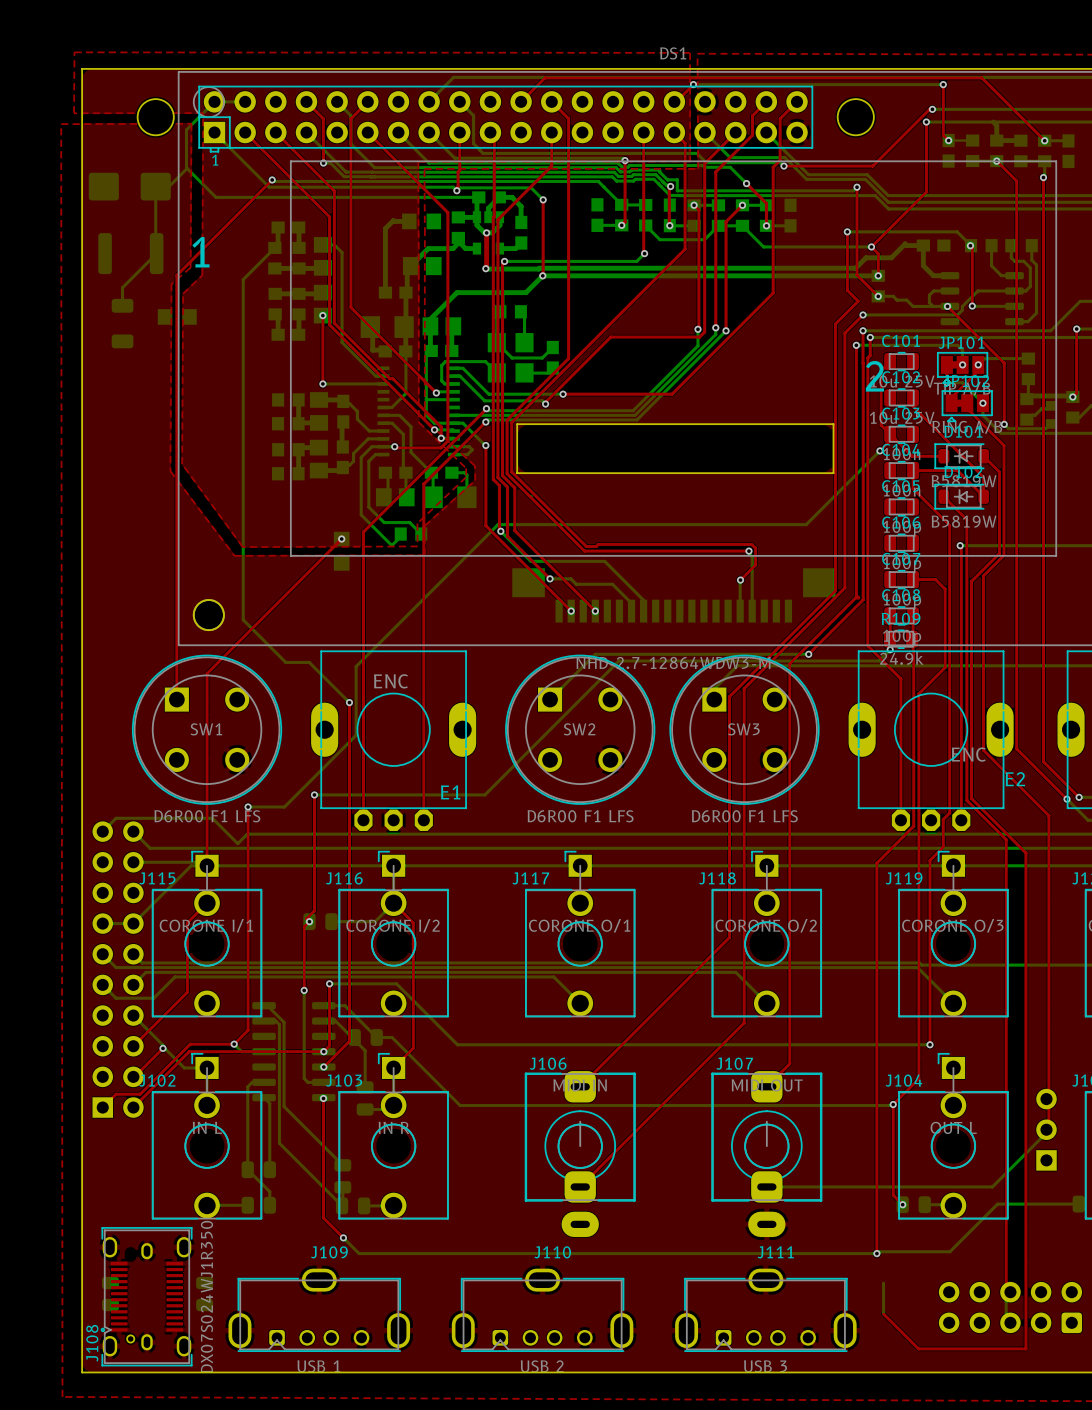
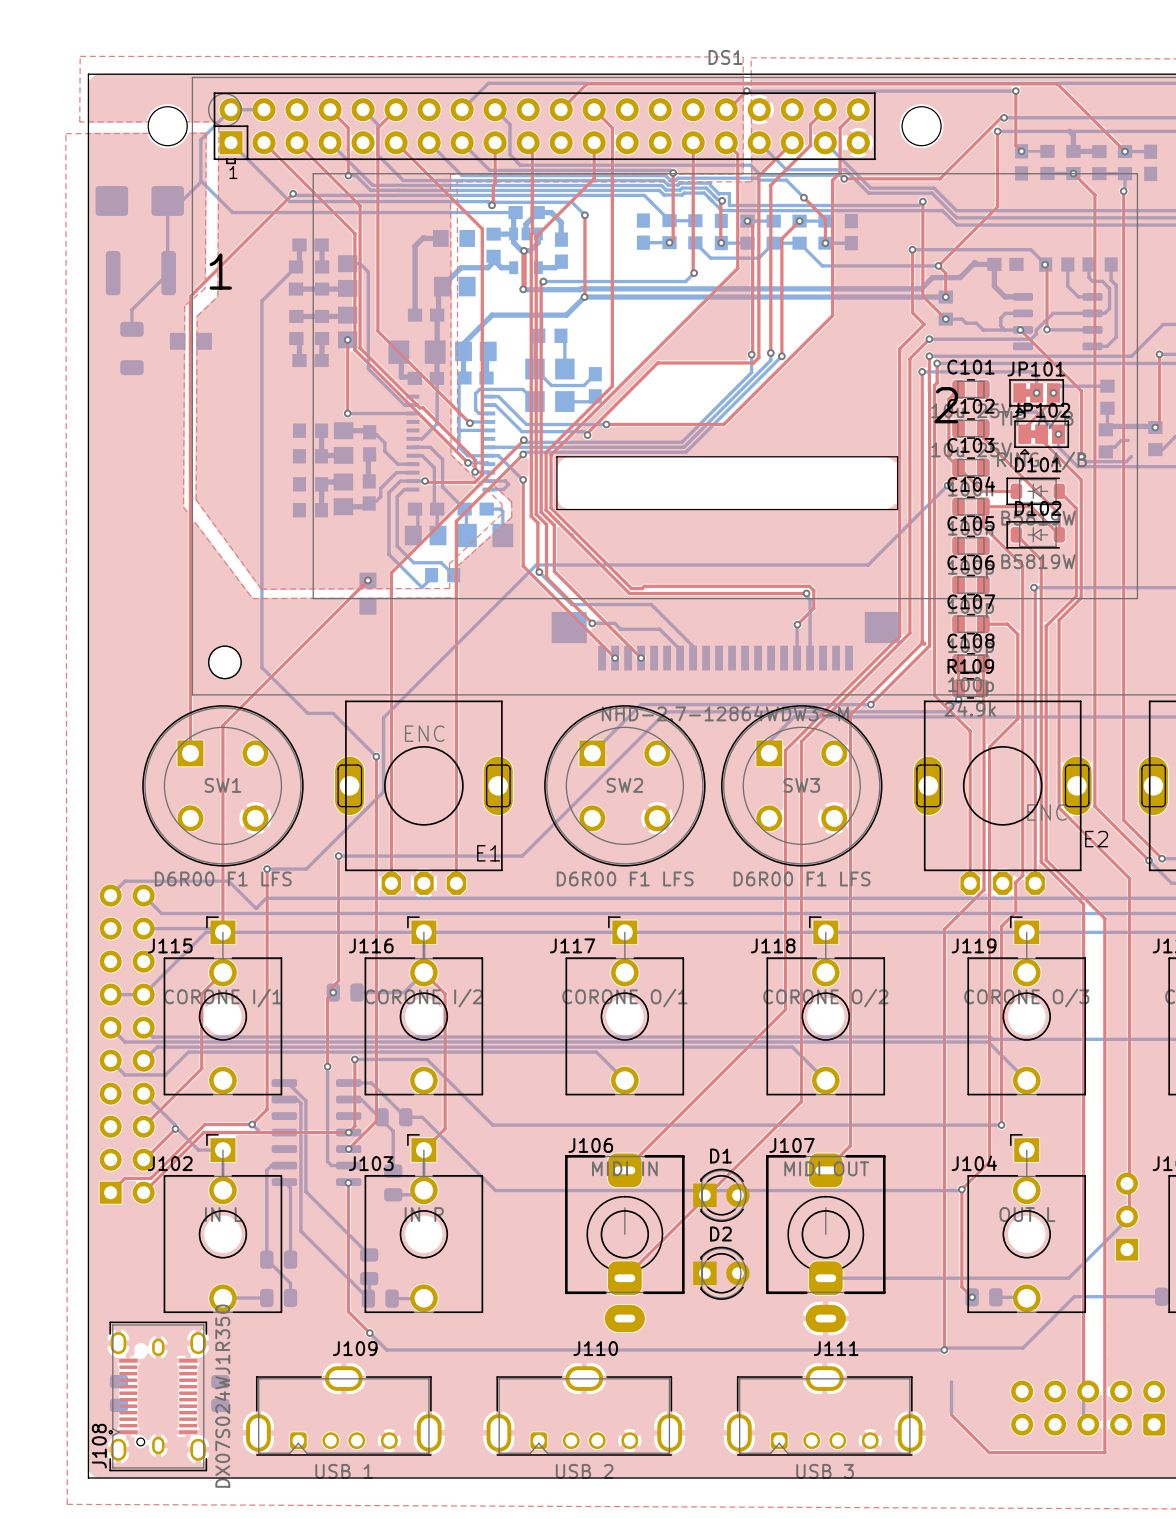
part: (1050, 414) -> none
D1: none -> (721, 1195)
D2: none -> (721, 1273)

